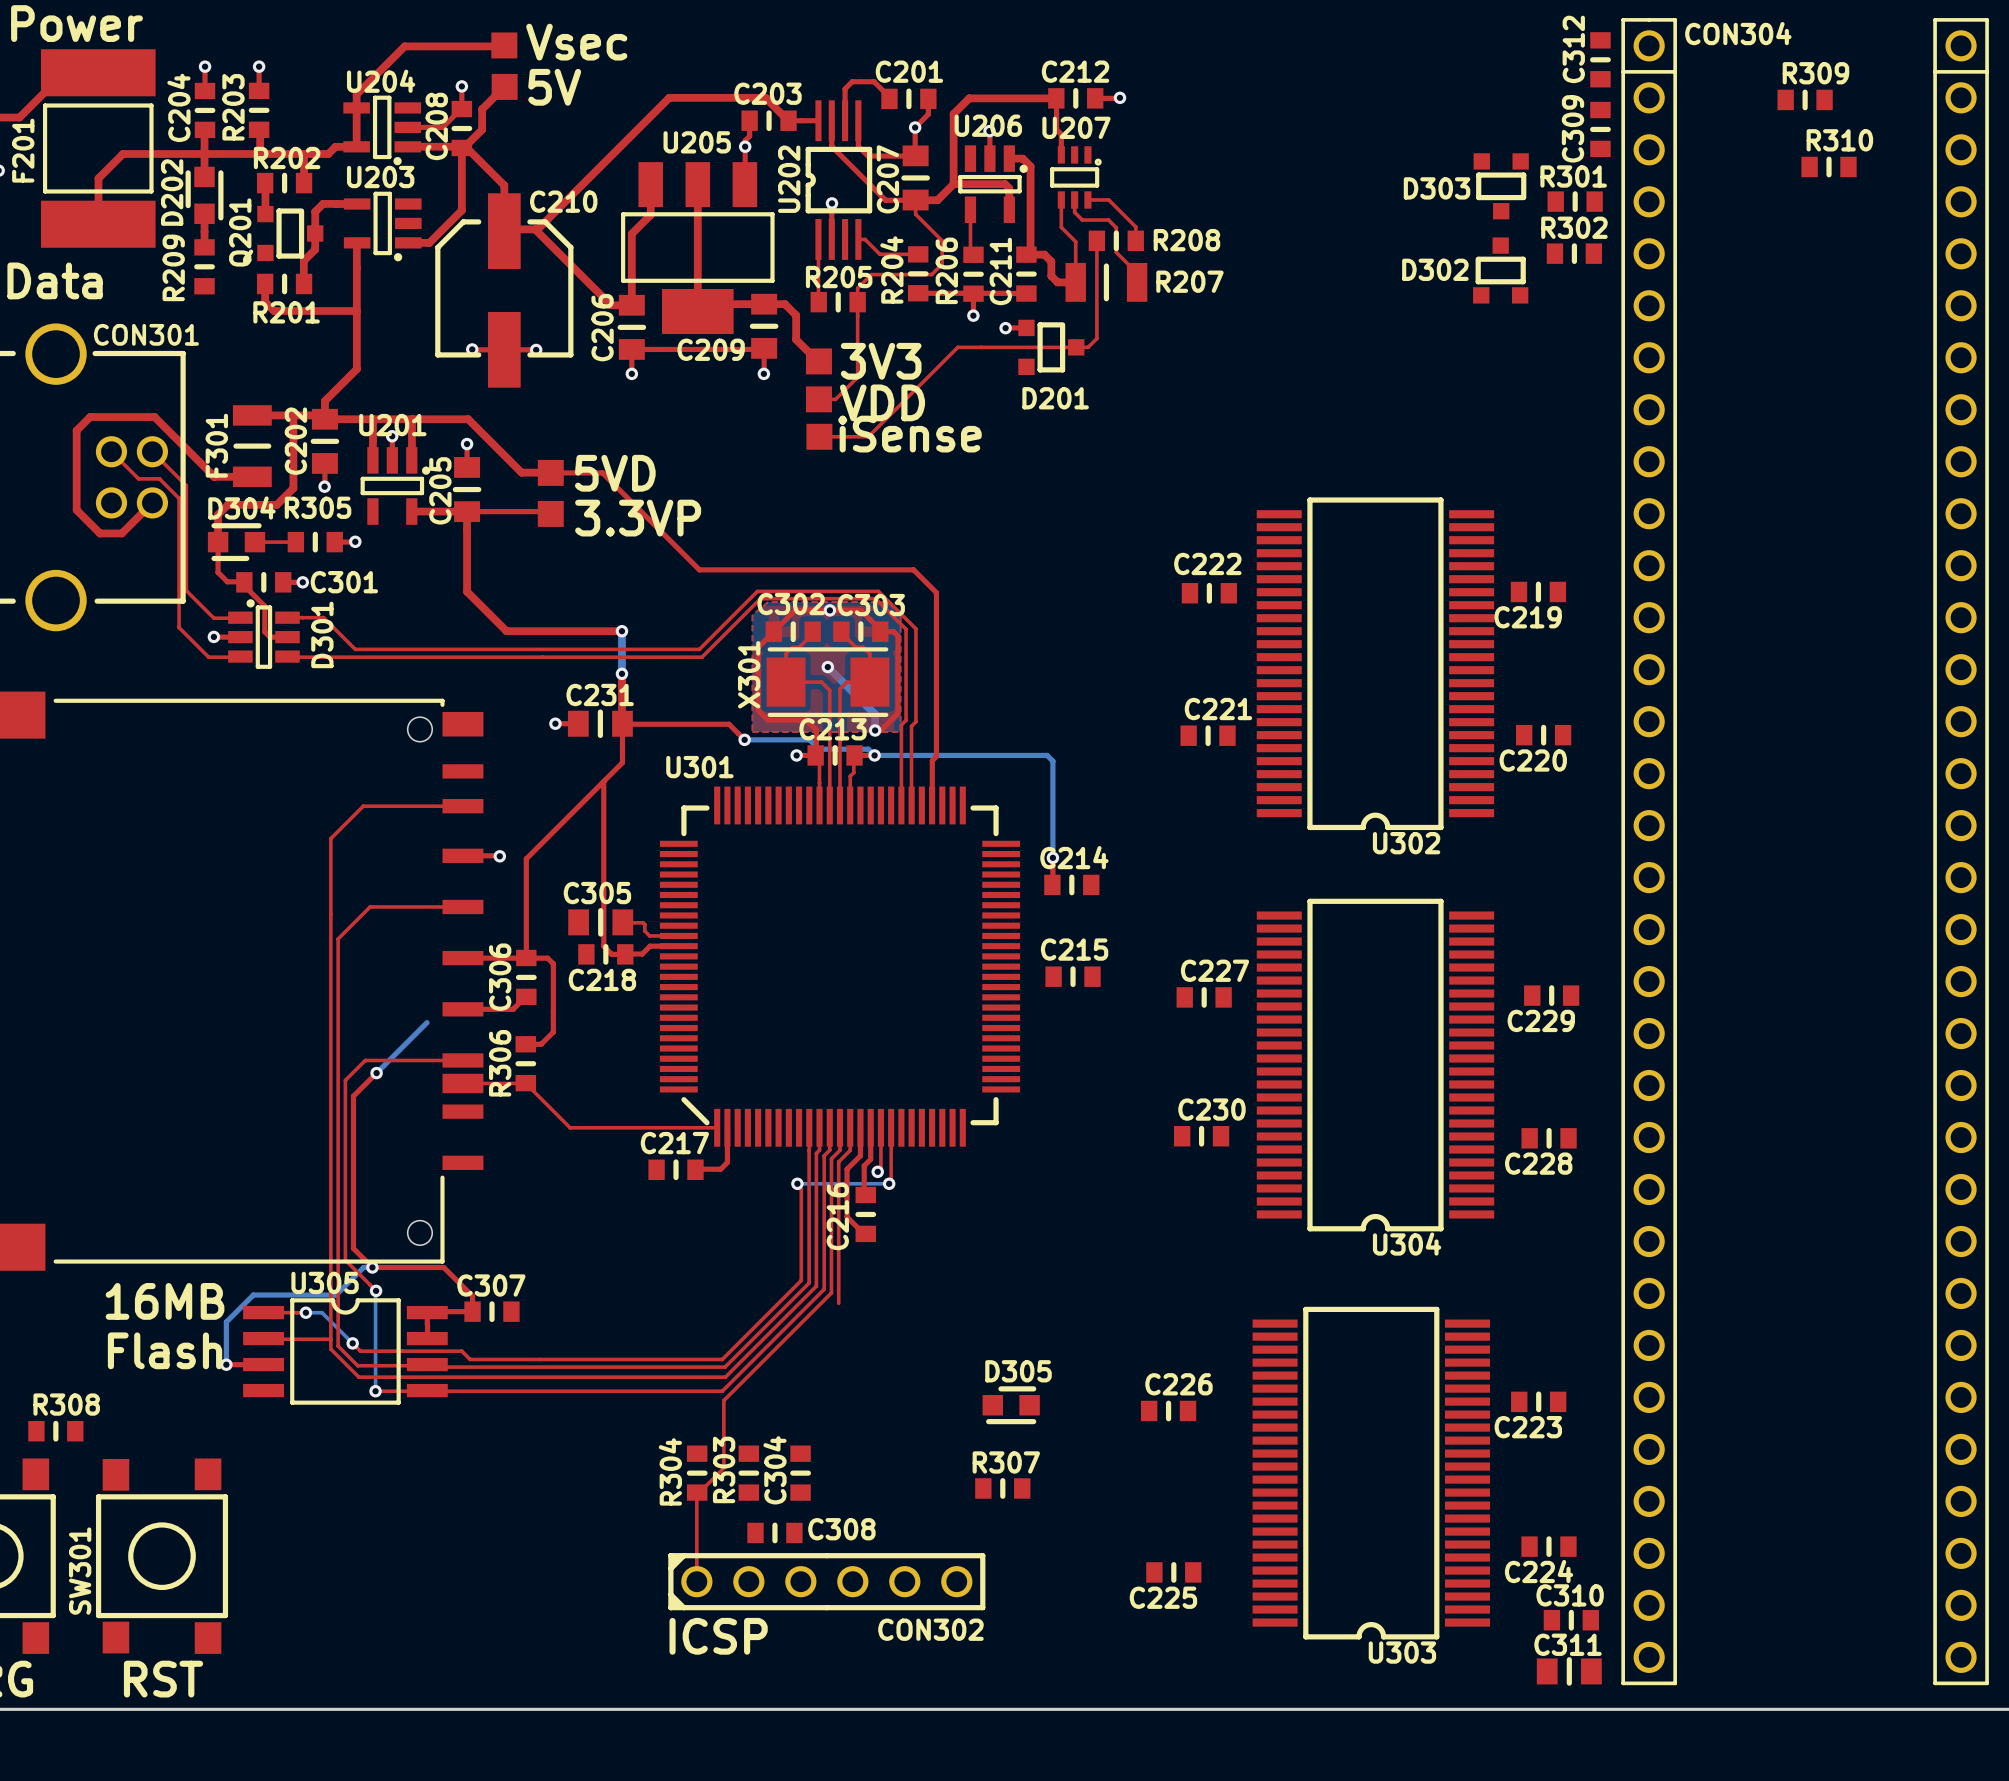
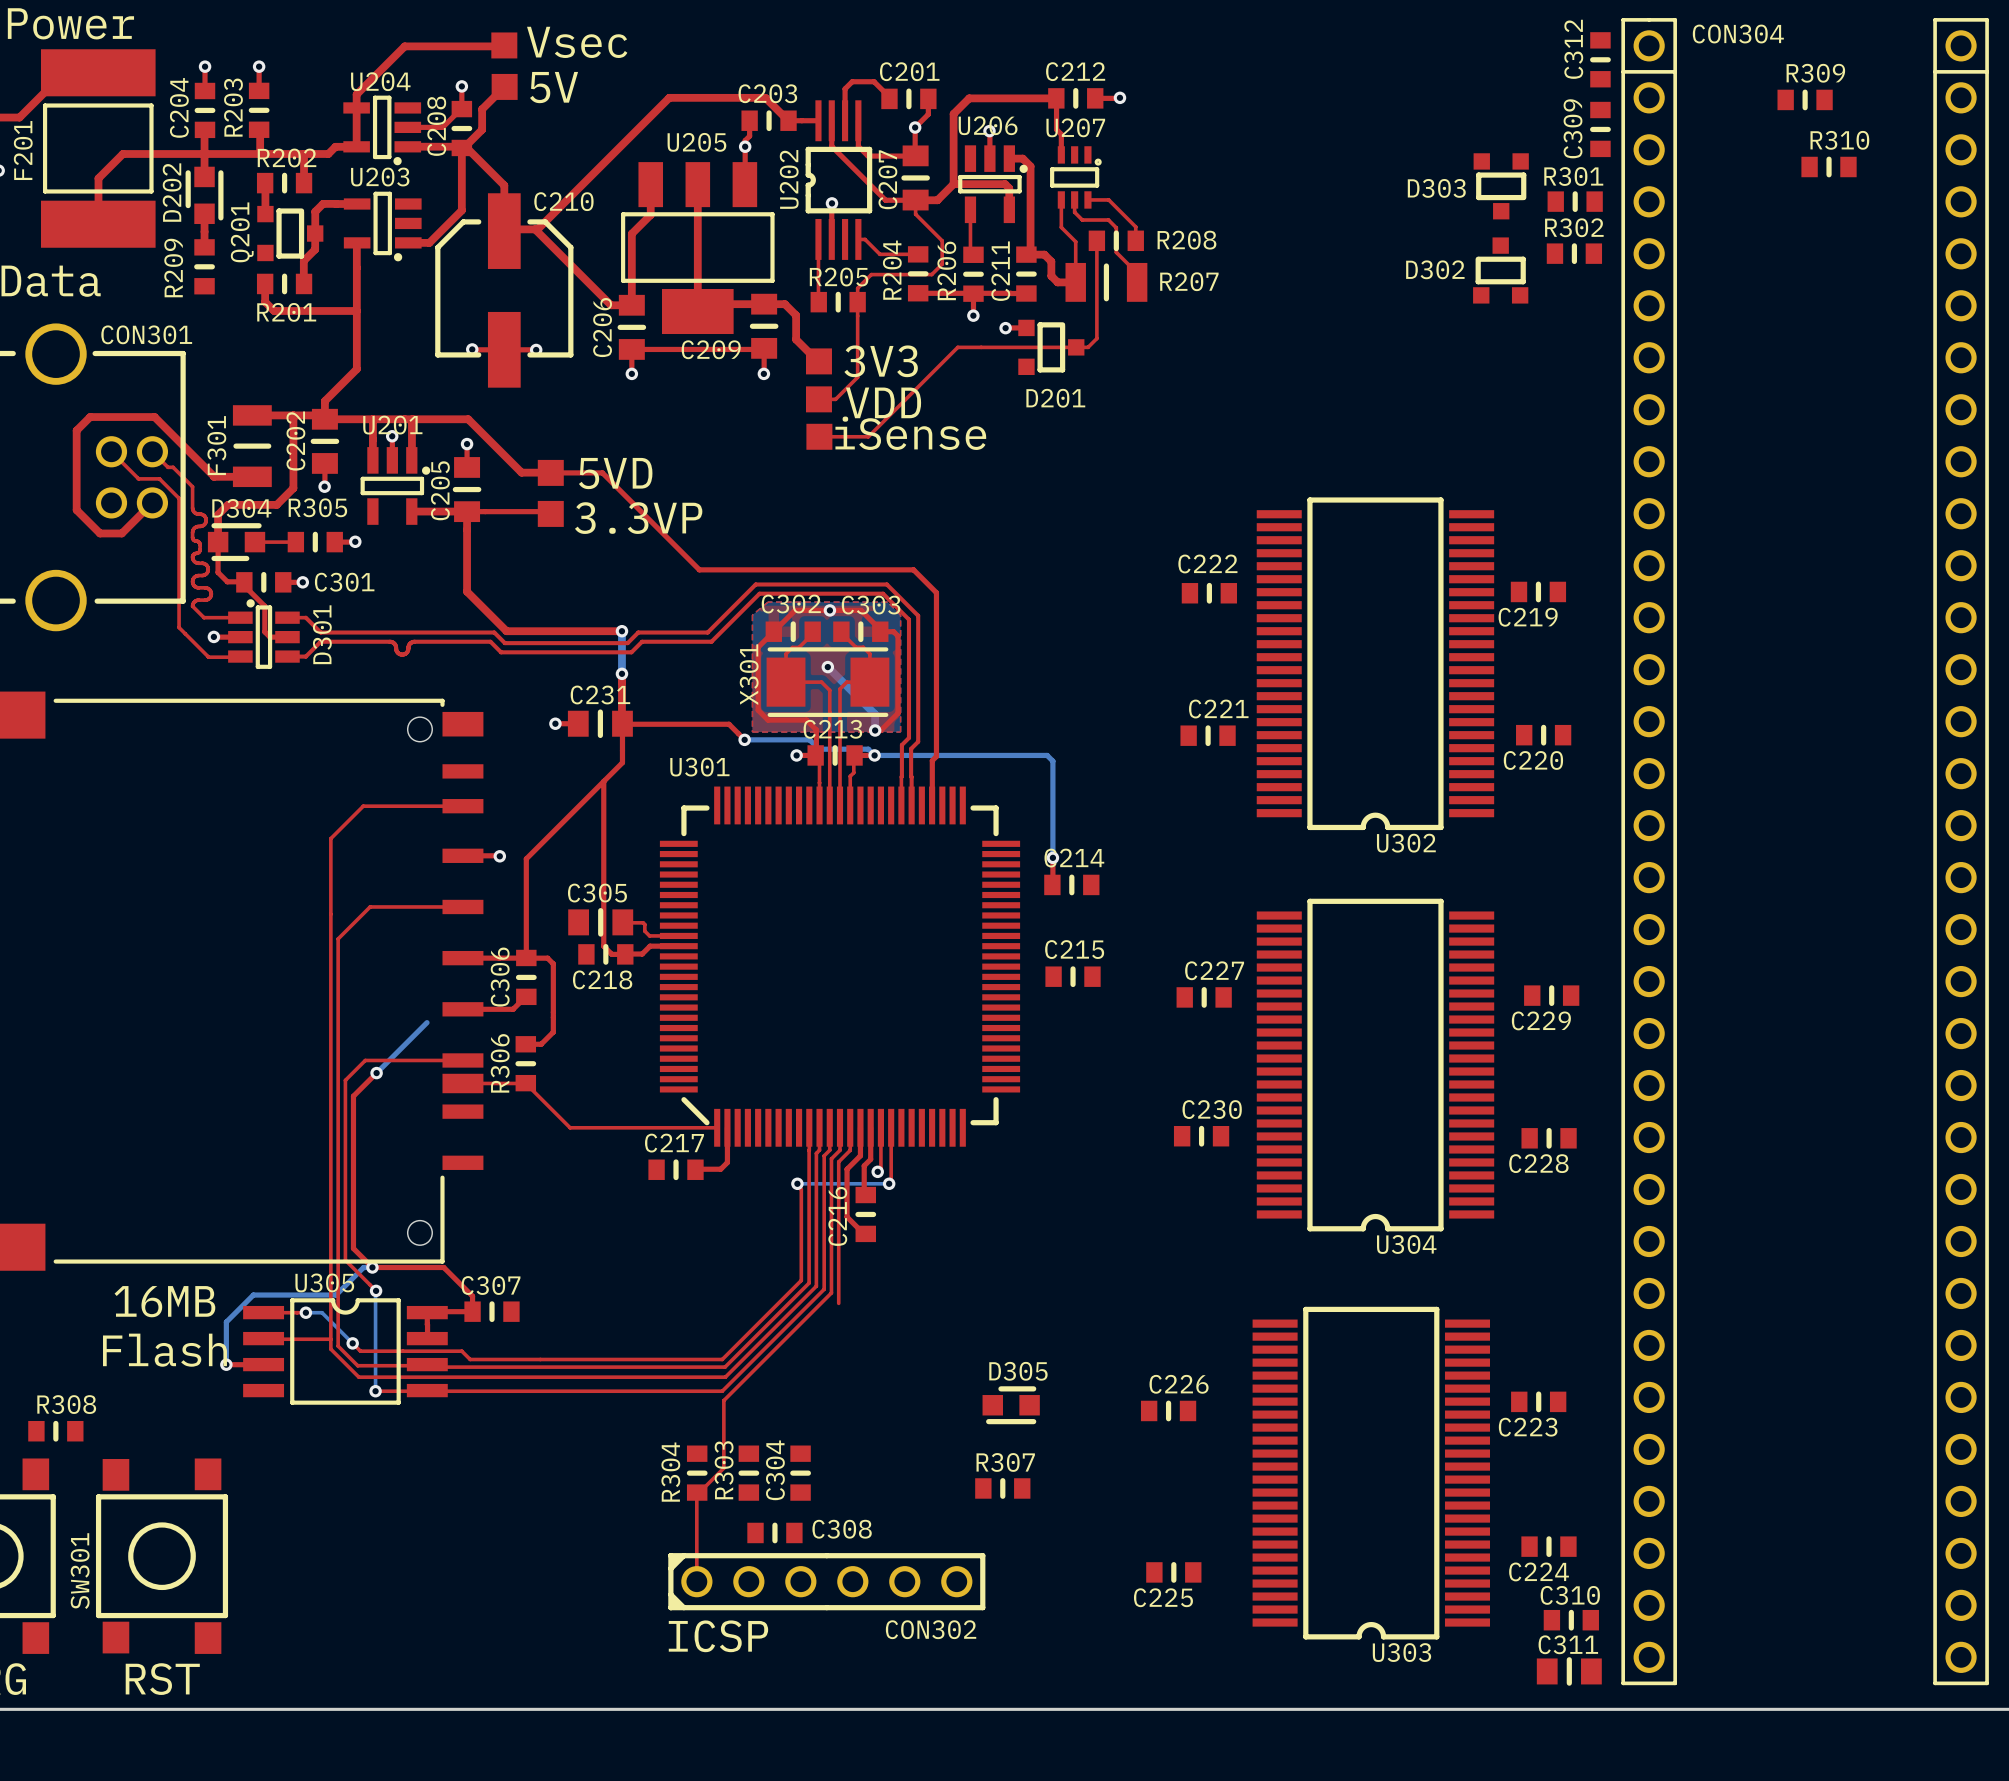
top track: (168, 467) (186, 485) (186, 590) (213, 618) (240, 618) -> (168, 467) (173, 467) (192, 486) (193, 510) (203, 515) (206, 518) (203, 525) (193, 529) (192, 538) (199, 542) (200, 549) (192, 557) (196, 562) (205, 564) (208, 570) (204, 574) (194, 576) (192, 581) (196, 587) (209, 589) (211, 595) (207, 599) (196, 600) (192, 606) (204, 617) (240, 617) (231, 617)
top track: (305, 617) (323, 617) (355, 649) (699, 649) (757, 591) (878, 591) (915, 628) (915, 721) (911, 726) (911, 805) -> (305, 617) (320, 632) (494, 632) (504, 643) (627, 643) (638, 632) (707, 632) (755, 584) (886, 584) (918, 615) (918, 741) (911, 748) (911, 805)
top track: (286, 657) (702, 657) (760, 598) (875, 598) (906, 629) (906, 720) (901, 724) (901, 777) -> (287, 656) (305, 656) (320, 641) (391, 641) (395, 645) (397, 652) (402, 654) (407, 652) (409, 644) (414, 641) (490, 641) (501, 652) (631, 652) (642, 641) (711, 641) (759, 593) (883, 593) (908, 619) (908, 737) (901, 745) (901, 777)

